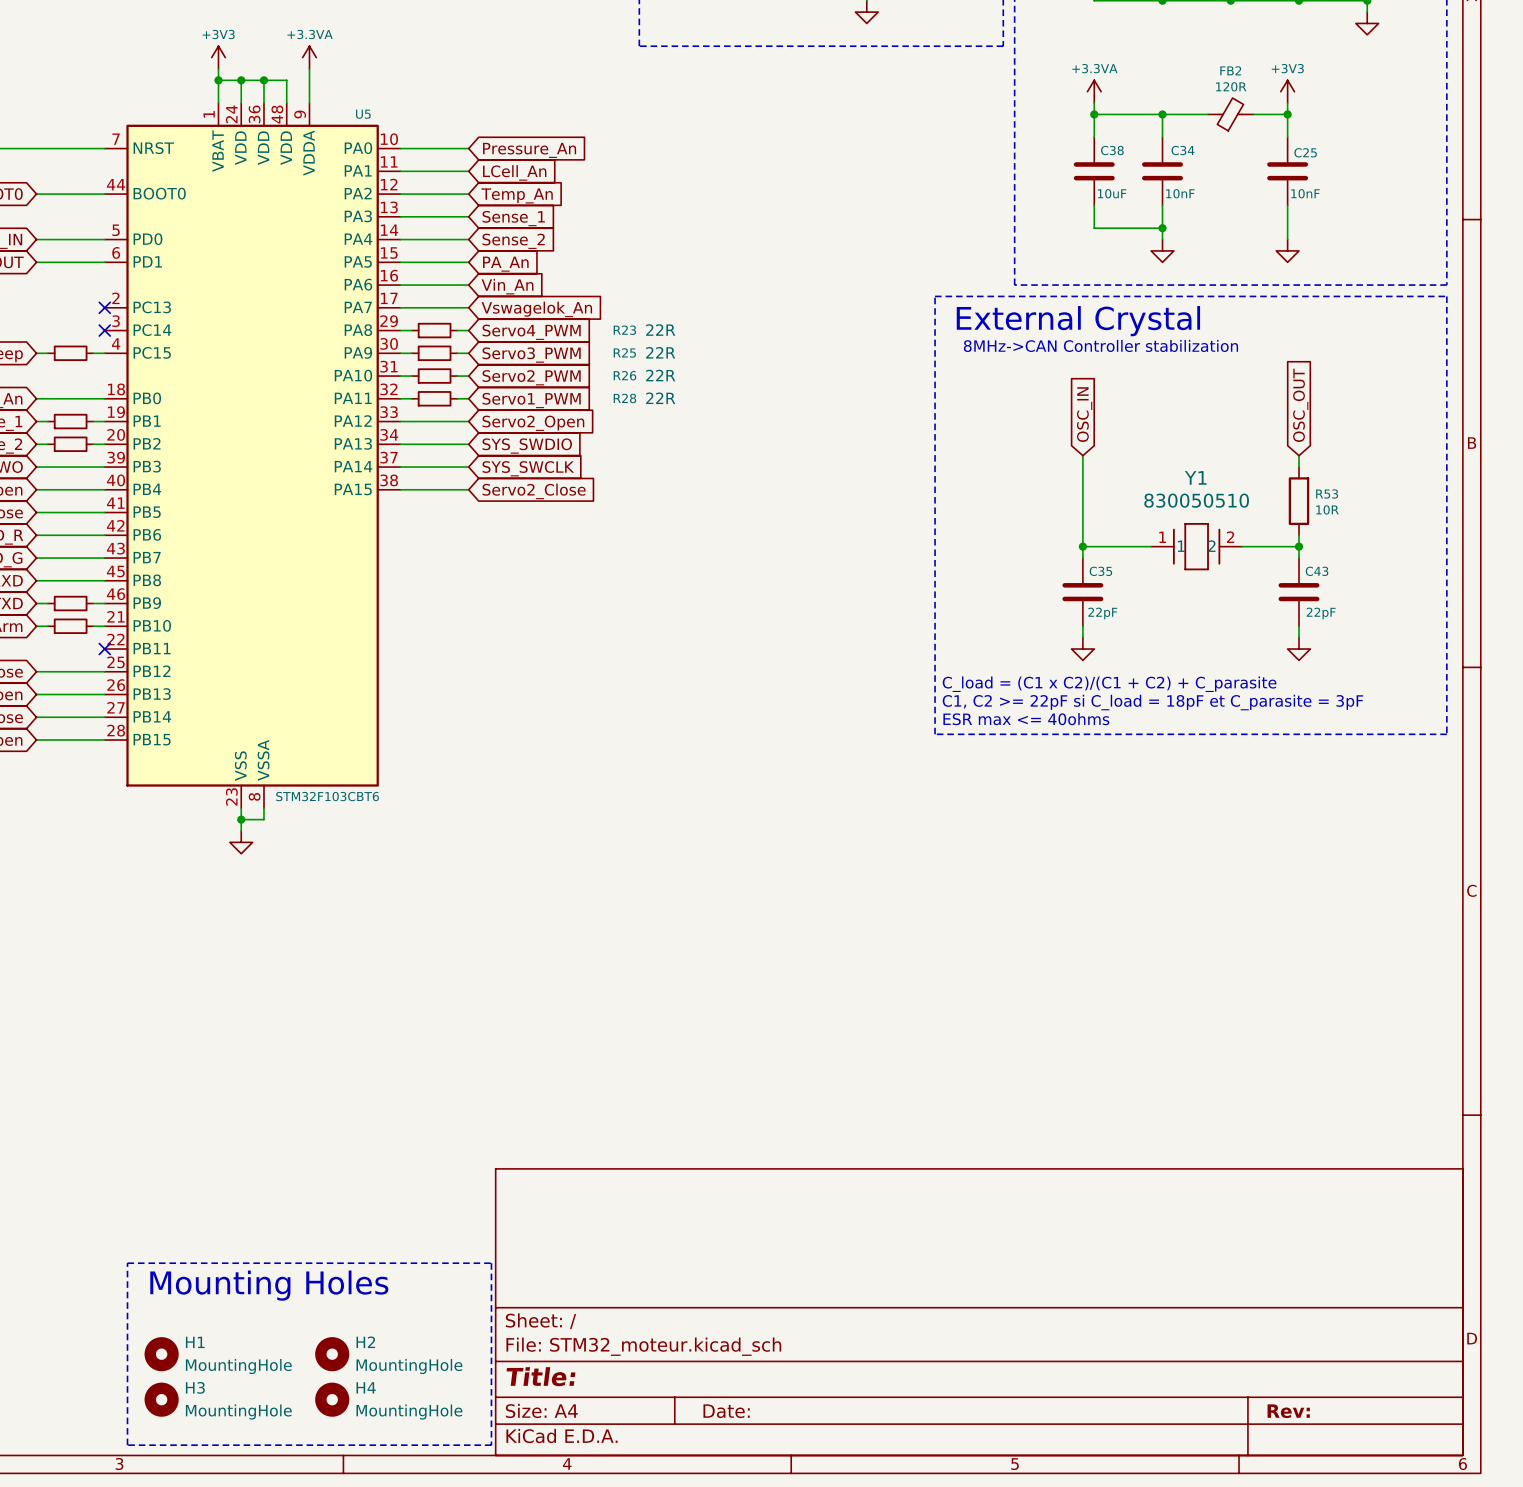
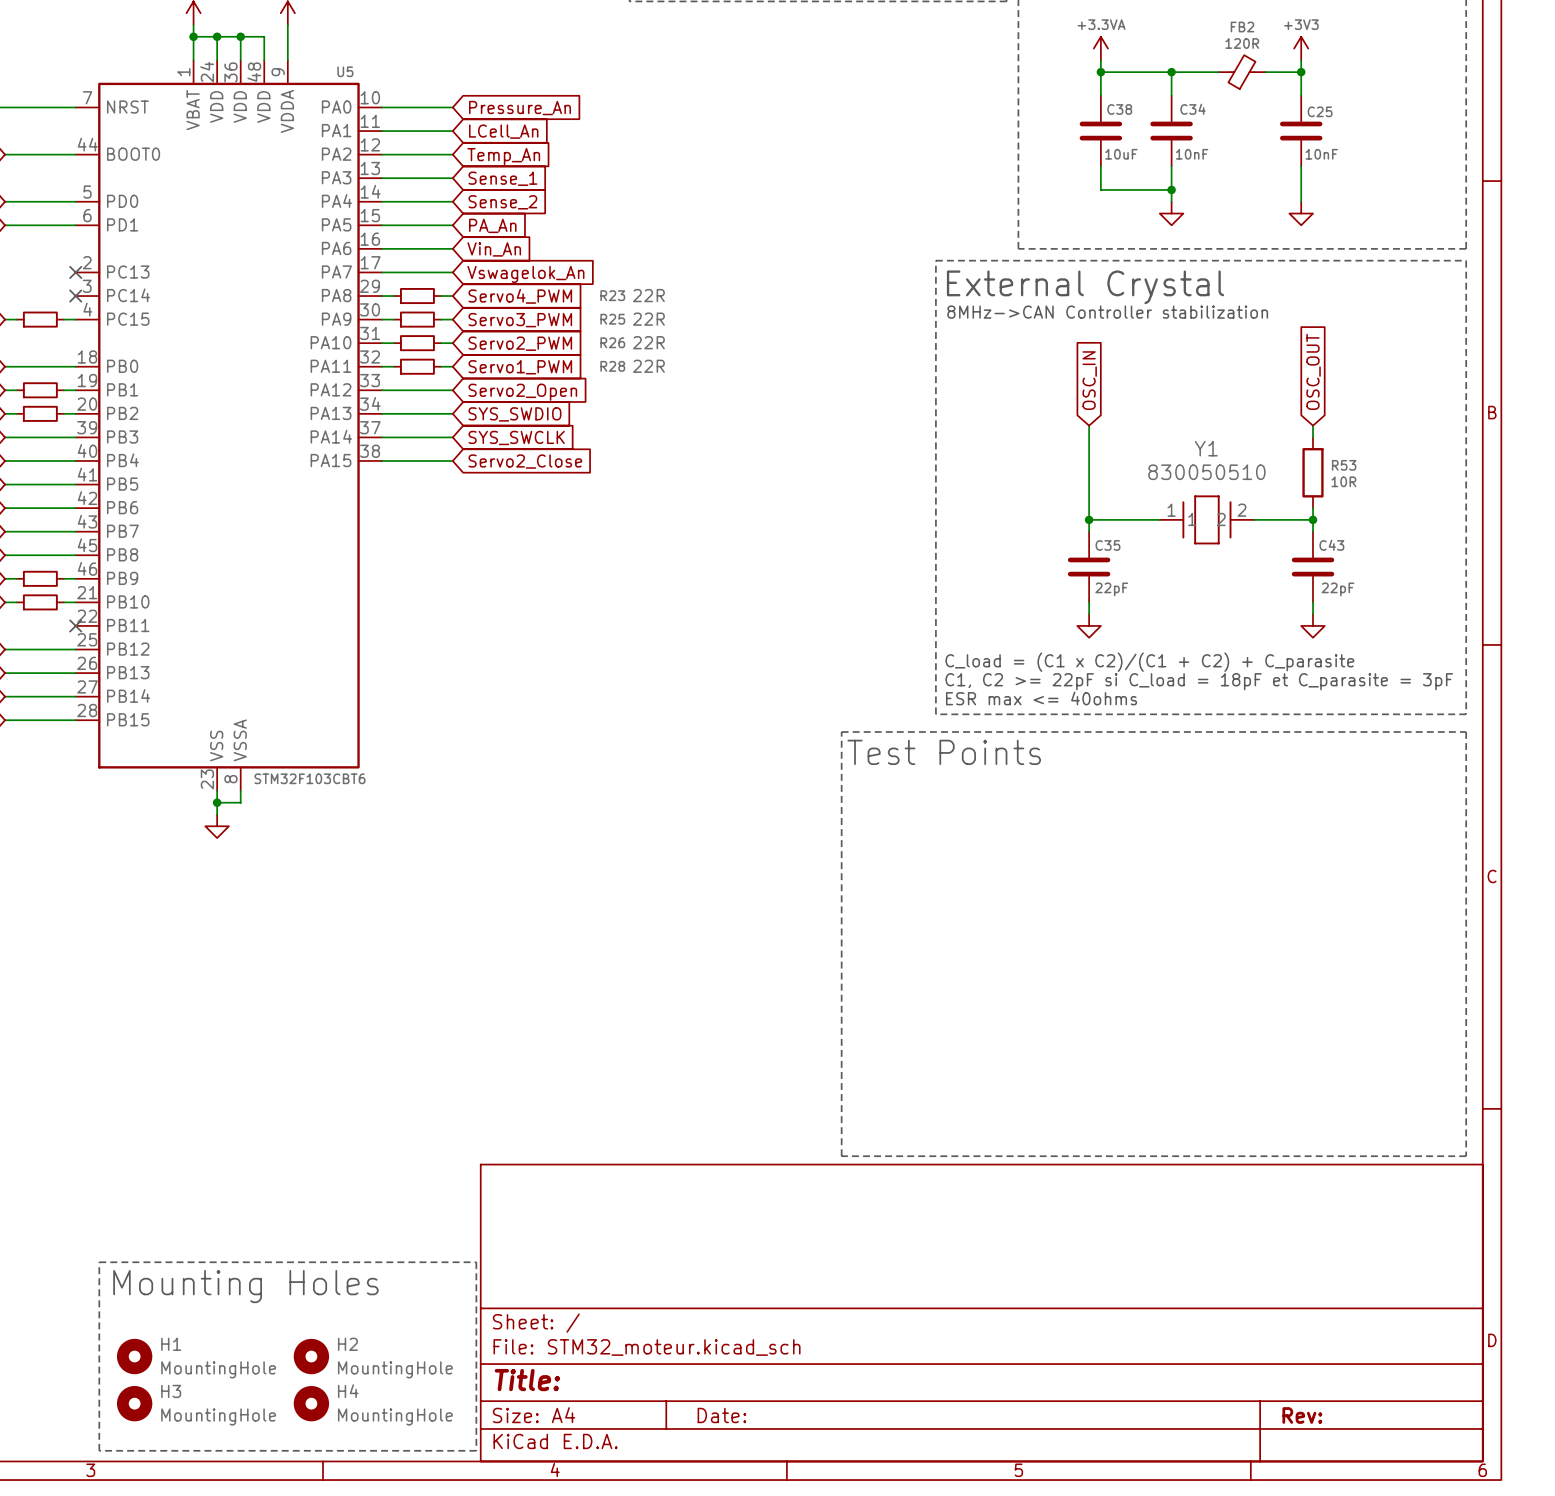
line: none -> (841, 732) (1466, 732) (1466, 1156) (841, 1156) (841, 732)
text: none -> Test Points (944, 752)

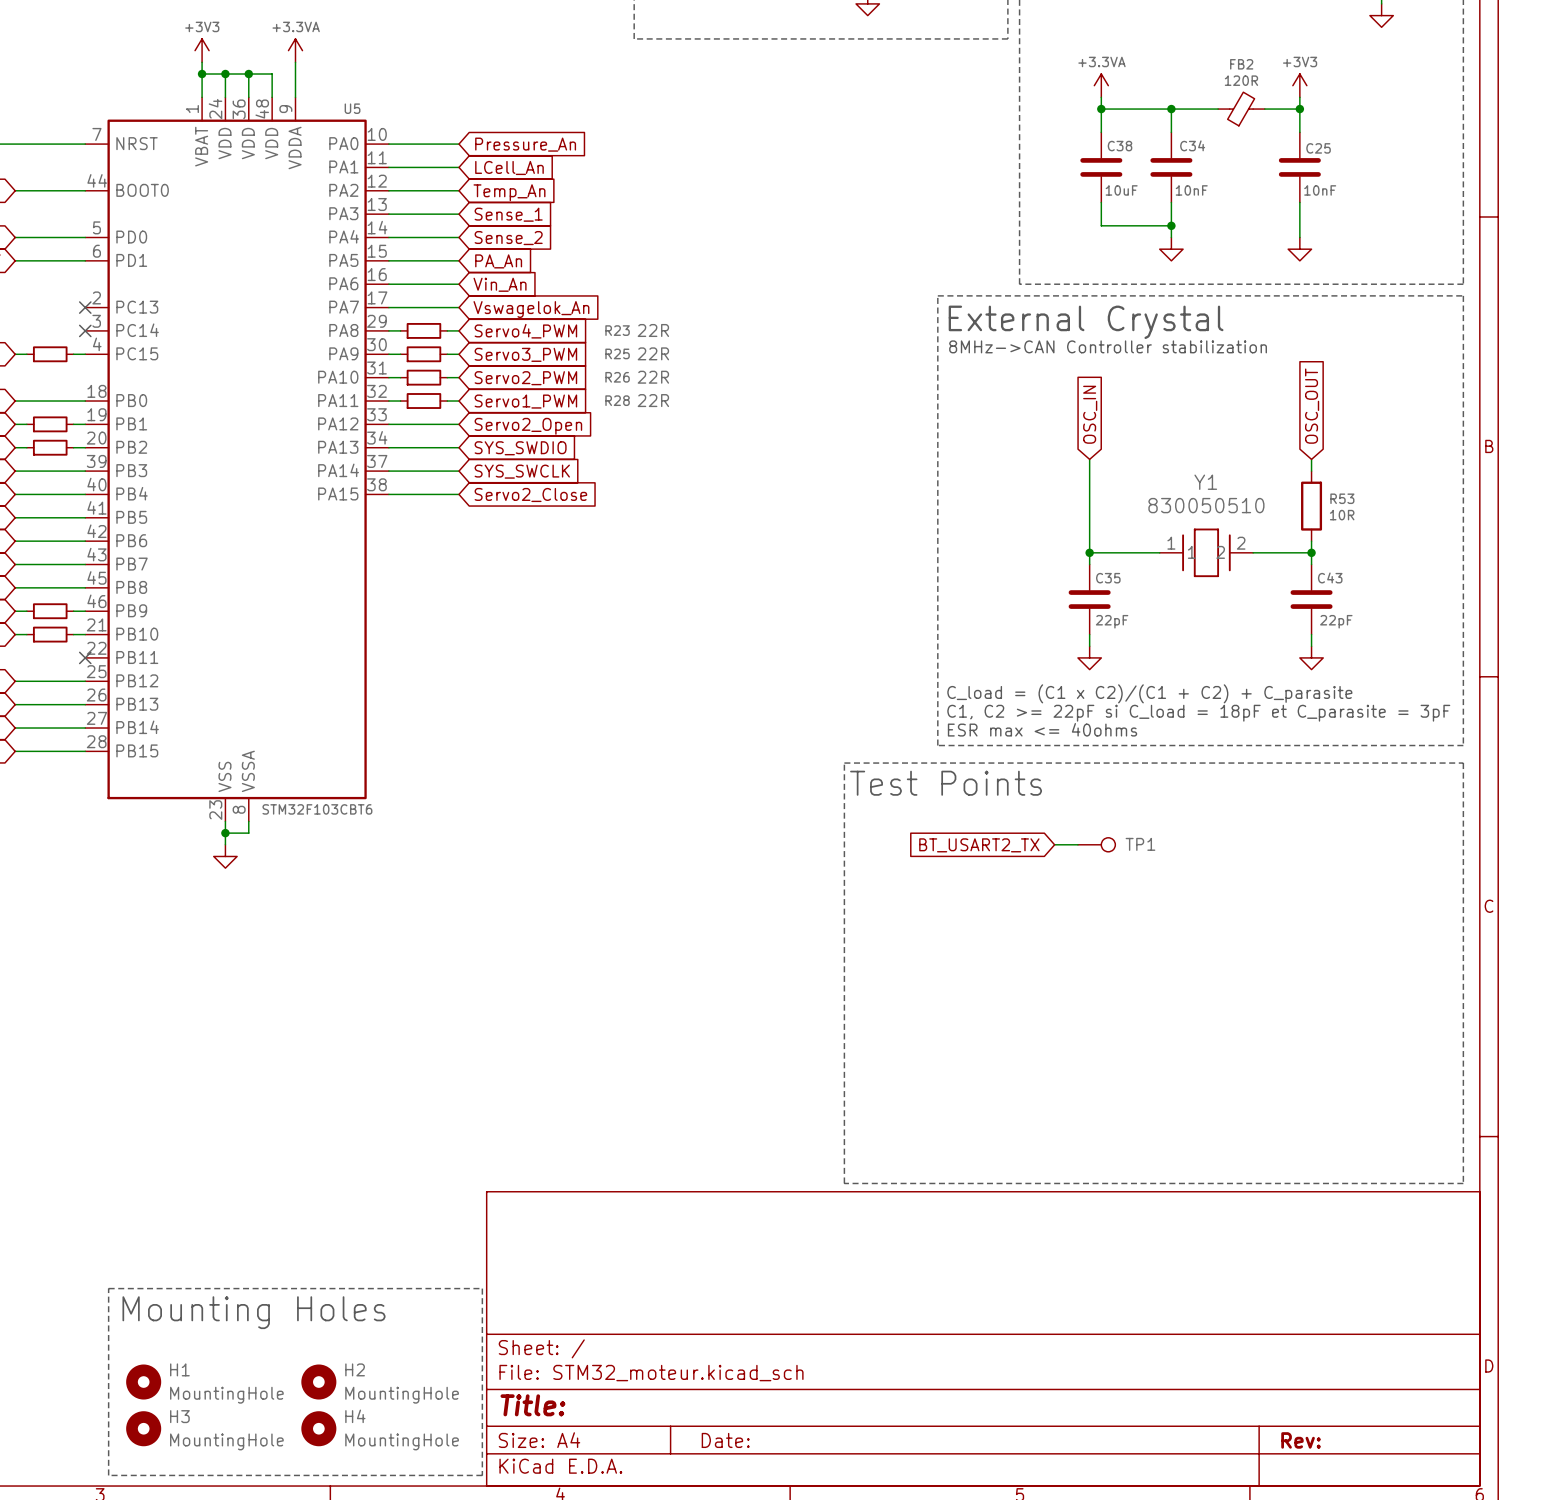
wire: none -> (1054, 844) (1077, 844)
TP1: none -> (1096, 844)
global label: none -> BT_USART2_TX (979, 845)

